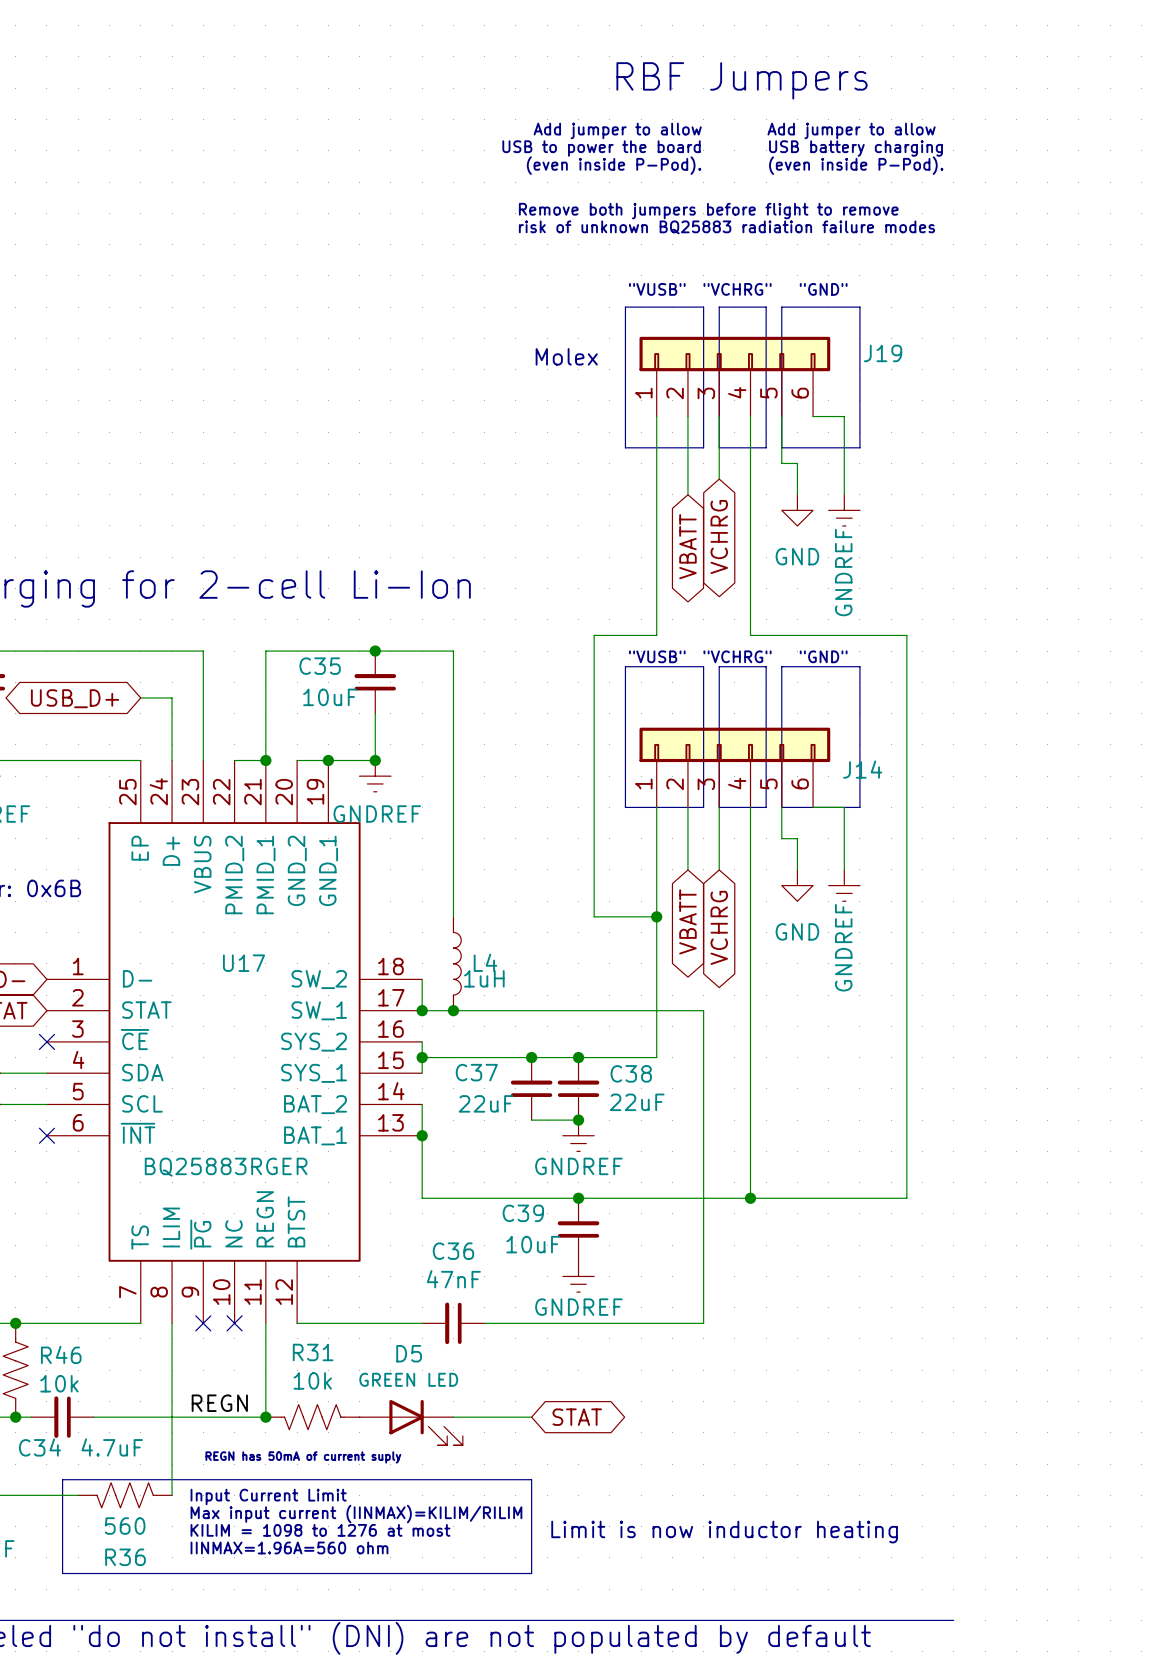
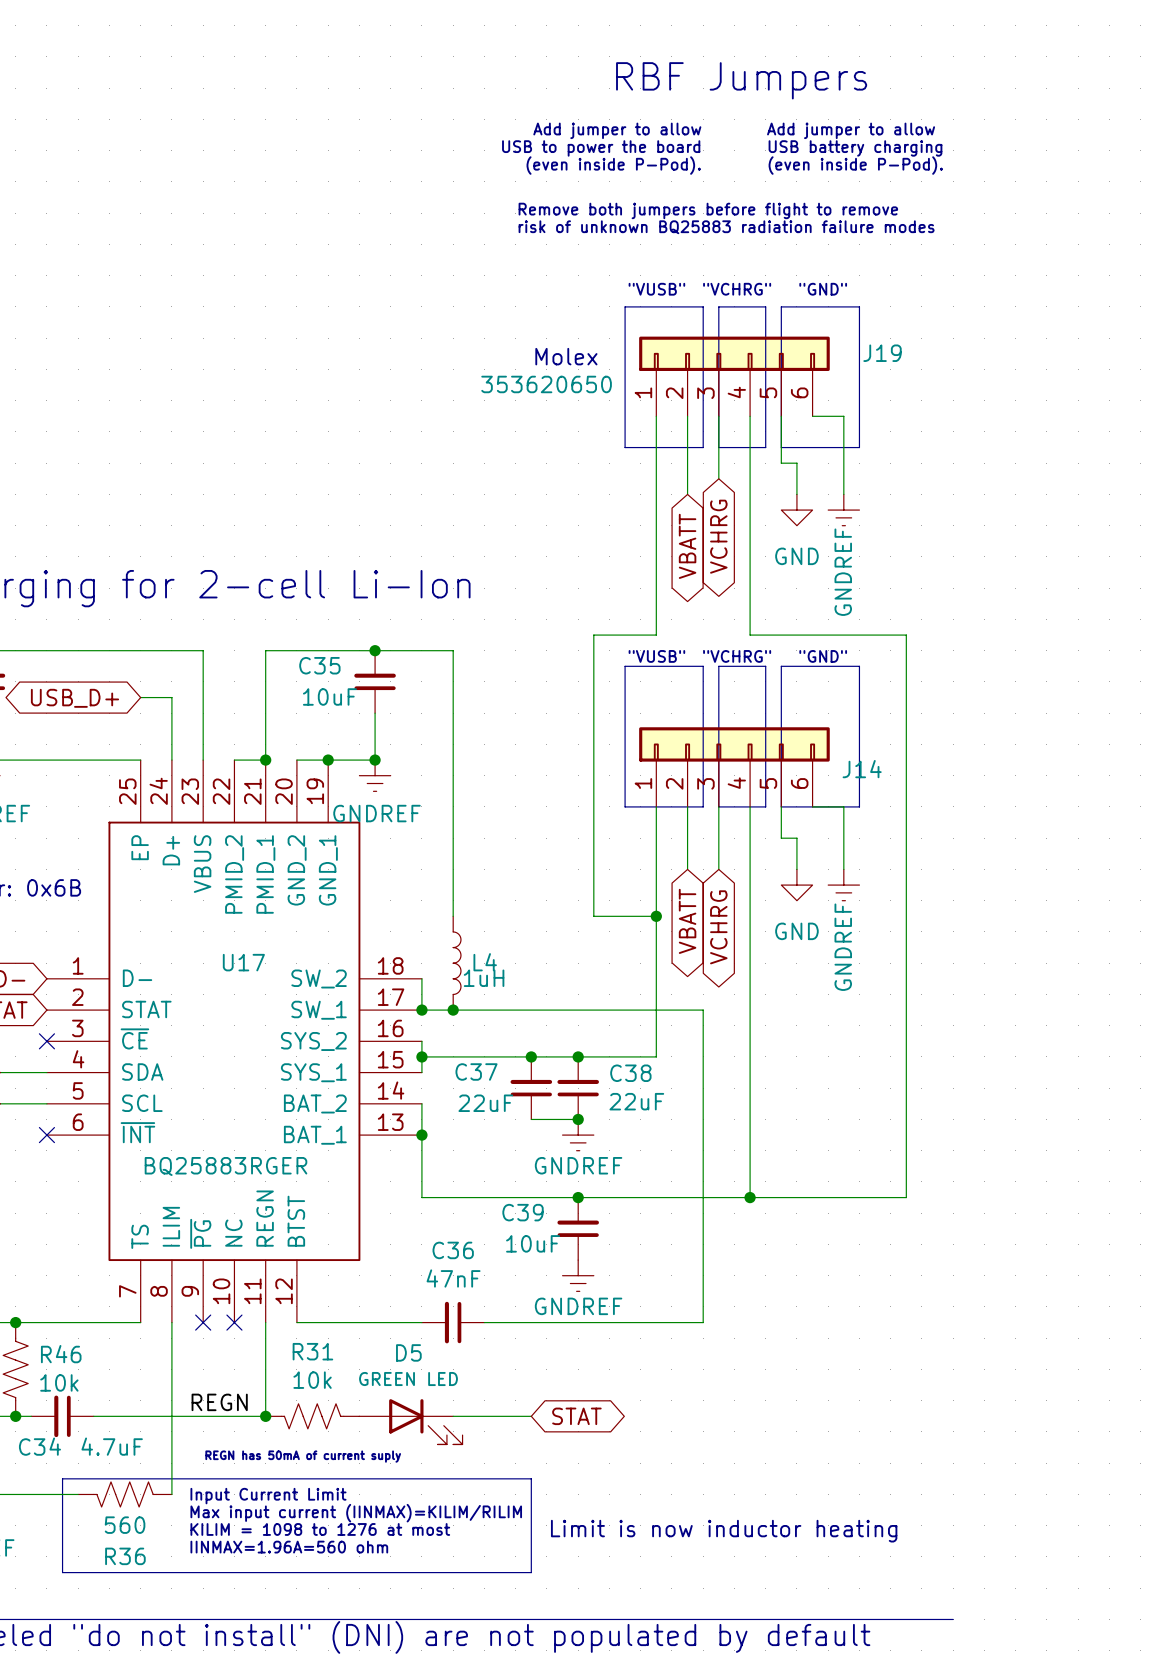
J19 value: none -> 353620650 (546, 384)

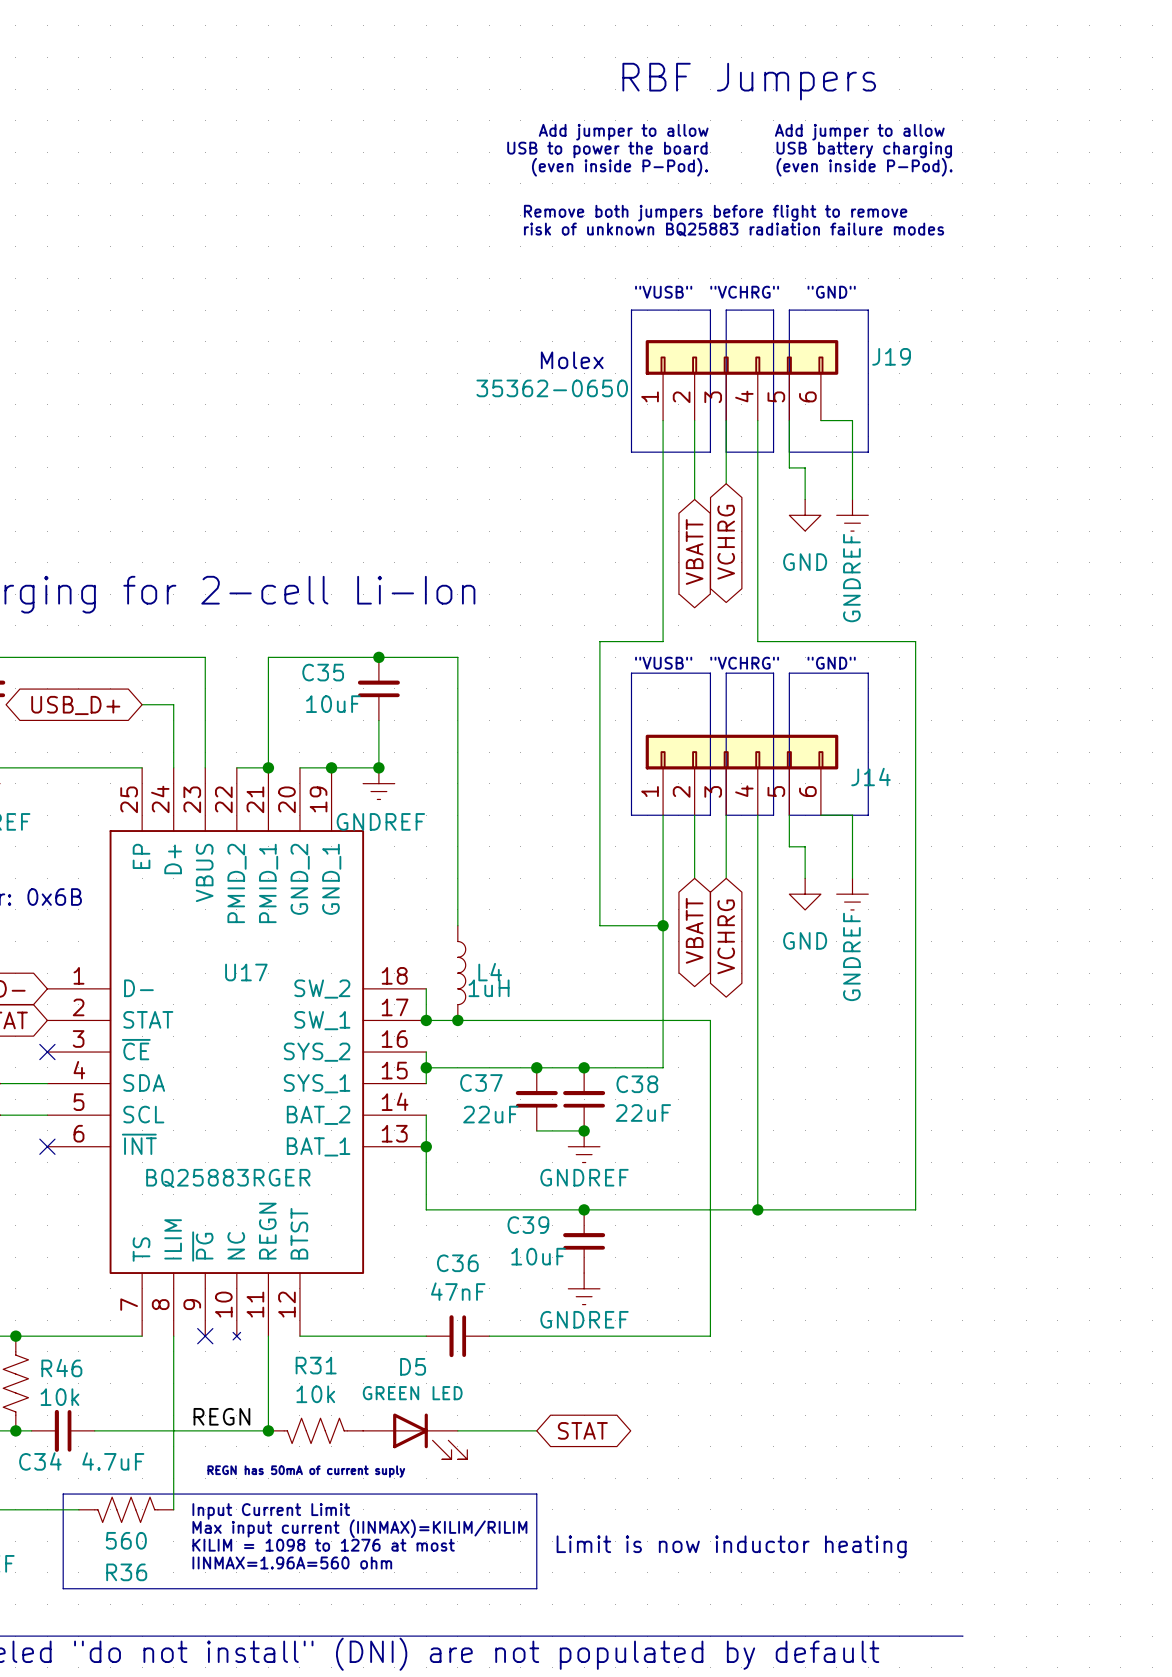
J19 value: 353620650 (546, 384) -> 35362-0650 (552, 388)
U17 symbol: [46, 760, 422, 1323] -> [47, 767, 427, 1340]
no-connect mark: (234, 1322) -> none

